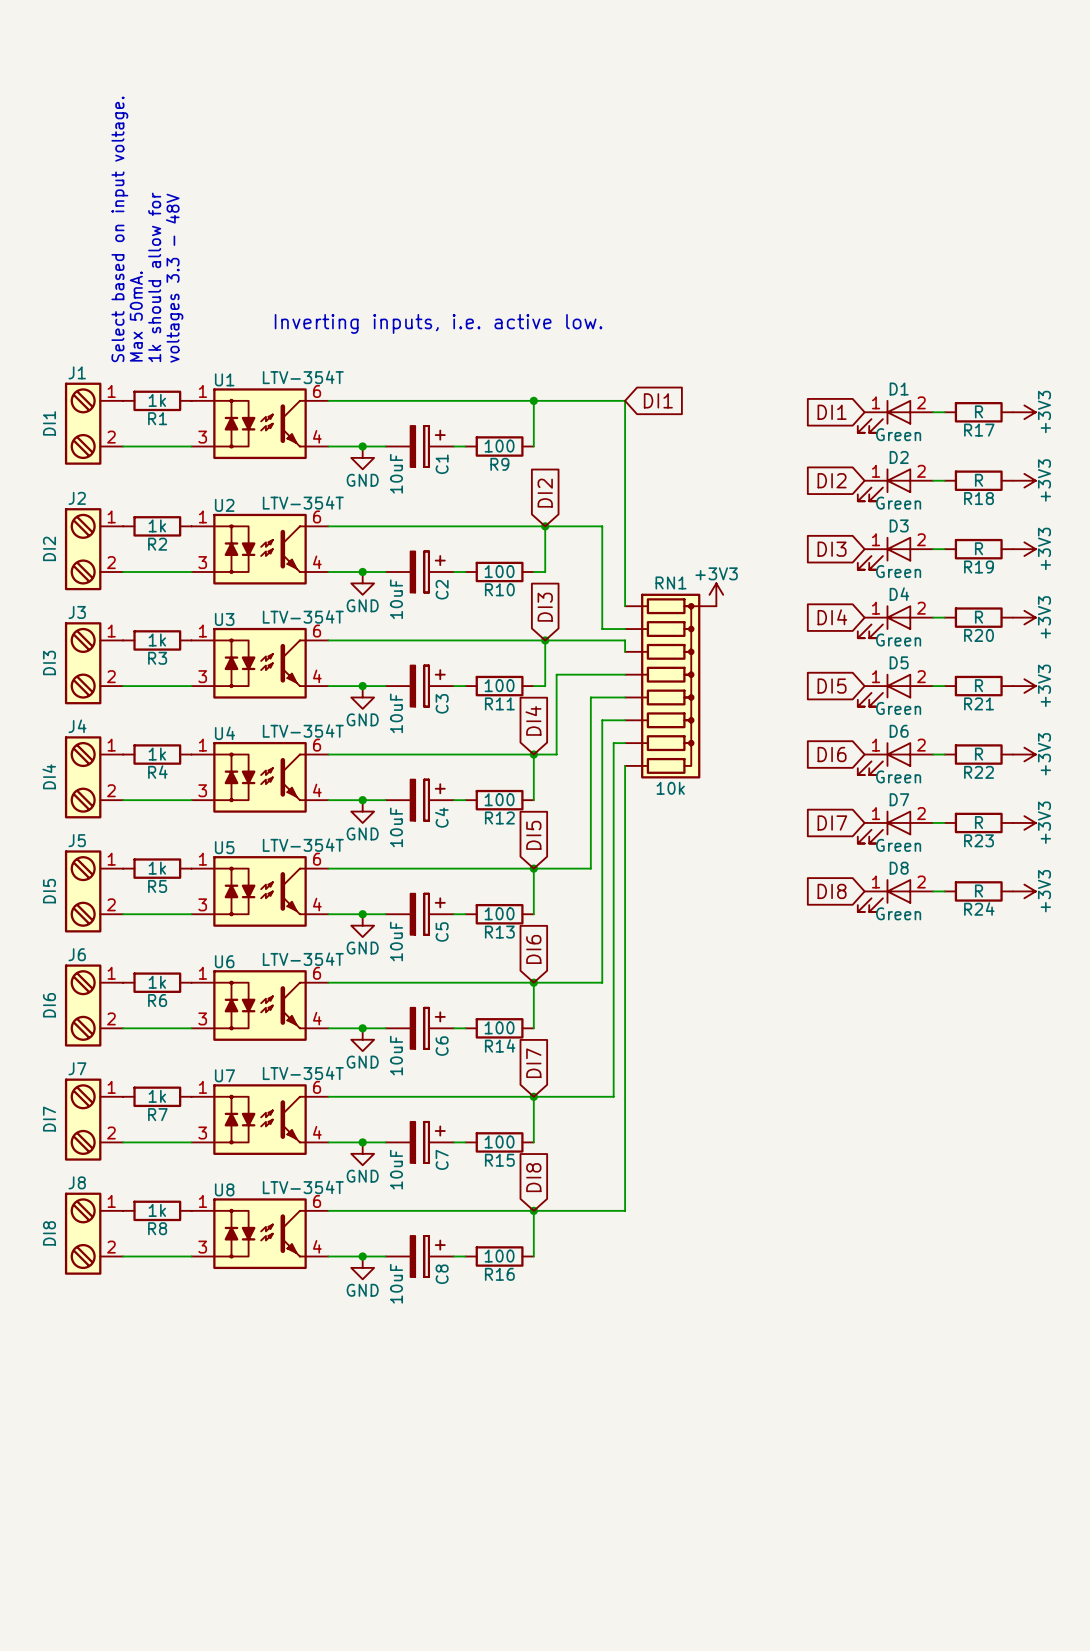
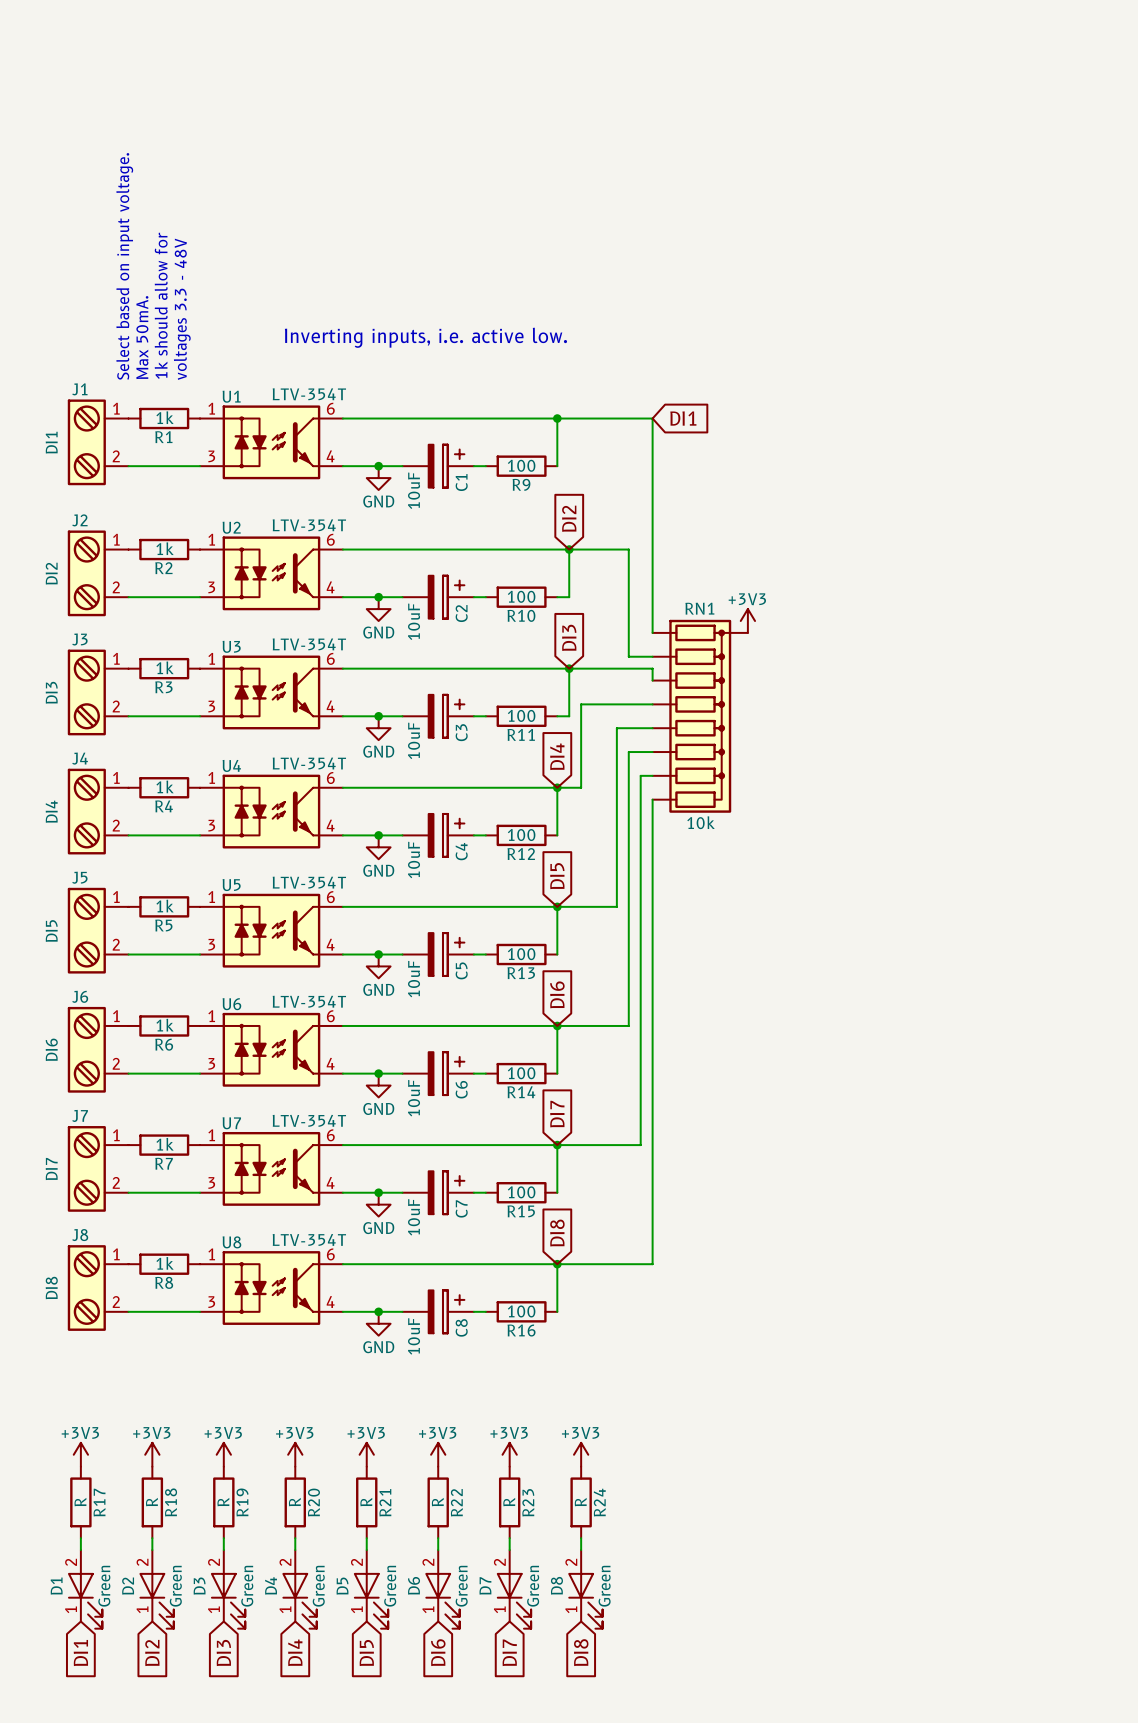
global label: DI1 (832, 412) -> none
wire: (933, 412) (944, 412) -> none
R17 rotation: 0° (978, 412) -> 90° clockwise (80, 1502)
R17 position: (978, 412) -> (80, 1502)
power symbol: +3V3 (1024, 412) -> none
D1 rotation: 0° (884, 416) -> 90° counterclockwise (85, 1600)
D1 position: (895, 416) -> (85, 1589)
R17 name position: R17 (979, 430) -> R17 (99, 1502)
global label: DI2 (832, 480) -> none
wire: (933, 480) (944, 480) -> none
R18 rotation: 0° (978, 480) -> 90° clockwise (152, 1502)
R18 position: (978, 480) -> (152, 1502)
power symbol: +3V3 (1024, 480) -> none
D2 rotation: 0° (884, 484) -> 90° counterclockwise (156, 1600)
D2 position: (895, 484) -> (156, 1589)
R18 name position: R18 (979, 498) -> R18 (171, 1502)
global label: DI3 (832, 549) -> none
wire: (933, 549) (944, 549) -> none
R19 rotation: 0° (978, 549) -> 90° clockwise (223, 1502)
R19 position: (978, 549) -> (223, 1502)
power symbol: +3V3 (1024, 549) -> none
D3 rotation: 0° (884, 553) -> 90° counterclockwise (228, 1600)
D3 position: (895, 553) -> (228, 1589)
R19 name position: R19 (979, 567) -> R19 (242, 1502)
global label: DI4 (832, 617) -> none
wire: (933, 617) (944, 617) -> none
R20 rotation: 0° (978, 617) -> 90° clockwise (295, 1502)
R20 position: (978, 617) -> (295, 1502)
power symbol: +3V3 (1024, 617) -> none
D4 rotation: 0° (884, 621) -> 90° counterclockwise (299, 1600)
D4 position: (895, 621) -> (299, 1589)
R20 name position: R20 (979, 635) -> R20 (313, 1502)
global label: DI5 (832, 686) -> none
wire: (933, 686) (944, 686) -> none
R21 rotation: 0° (978, 686) -> 90° clockwise (366, 1502)
R21 position: (978, 686) -> (366, 1502)
power symbol: +3V3 (1024, 686) -> none
D5 rotation: 0° (884, 690) -> 90° counterclockwise (371, 1600)
D5 position: (895, 690) -> (371, 1589)
R21 name position: R21 (979, 703) -> R21 (385, 1502)
global label: DI6 (832, 754) -> none
wire: (933, 754) (944, 754) -> none
R22 rotation: 0° (978, 754) -> 90° clockwise (438, 1502)
R22 position: (978, 754) -> (438, 1502)
power symbol: +3V3 (1024, 754) -> none
D6 rotation: 0° (884, 758) -> 90° counterclockwise (442, 1600)
D6 position: (895, 758) -> (442, 1589)
R22 name position: R22 (979, 772) -> R22 (456, 1502)
global label: DI7 (832, 822) -> none
wire: (933, 822) (944, 822) -> none
R23 rotation: 0° (978, 822) -> 90° clockwise (509, 1502)
R23 position: (978, 822) -> (509, 1502)
power symbol: +3V3 (1024, 822) -> none
D7 rotation: 0° (884, 827) -> 90° counterclockwise (513, 1600)
D7 position: (895, 827) -> (513, 1589)
R23 name position: R23 (979, 840) -> R23 (528, 1502)
global label: DI8 (832, 891) -> none
wire: (933, 891) (944, 891) -> none
R24 rotation: 0° (978, 891) -> 90° clockwise (581, 1502)
R24 position: (978, 891) -> (581, 1502)
power symbol: +3V3 (1024, 891) -> none
D8 rotation: 0° (884, 895) -> 90° counterclockwise (585, 1600)
D8 position: (895, 895) -> (585, 1589)
R24 name position: R24 (979, 908) -> R24 (599, 1502)
power symbol: none -> +3V3 (80, 1454)
power symbol: none -> +3V3 (152, 1454)
power symbol: none -> +3V3 (223, 1454)
power symbol: none -> +3V3 (295, 1454)
power symbol: none -> +3V3 (366, 1454)
power symbol: none -> +3V3 (438, 1454)
power symbol: none -> +3V3 (509, 1454)
power symbol: none -> +3V3 (581, 1454)
wire: none -> (80, 1538) (80, 1550)
wire: none -> (152, 1538) (152, 1550)
wire: none -> (223, 1538) (223, 1550)
wire: none -> (295, 1538) (295, 1550)
wire: none -> (366, 1538) (366, 1550)
wire: none -> (438, 1538) (438, 1550)
wire: none -> (509, 1538) (509, 1550)
wire: none -> (581, 1538) (581, 1550)
global label: none -> DI1 (80, 1653)
global label: none -> DI2 (152, 1652)
global label: none -> DI3 (223, 1652)
global label: none -> DI4 (295, 1652)
global label: none -> DI5 (366, 1653)
global label: none -> DI6 (438, 1652)
global label: none -> DI7 (509, 1652)
global label: none -> DI8 (581, 1652)

